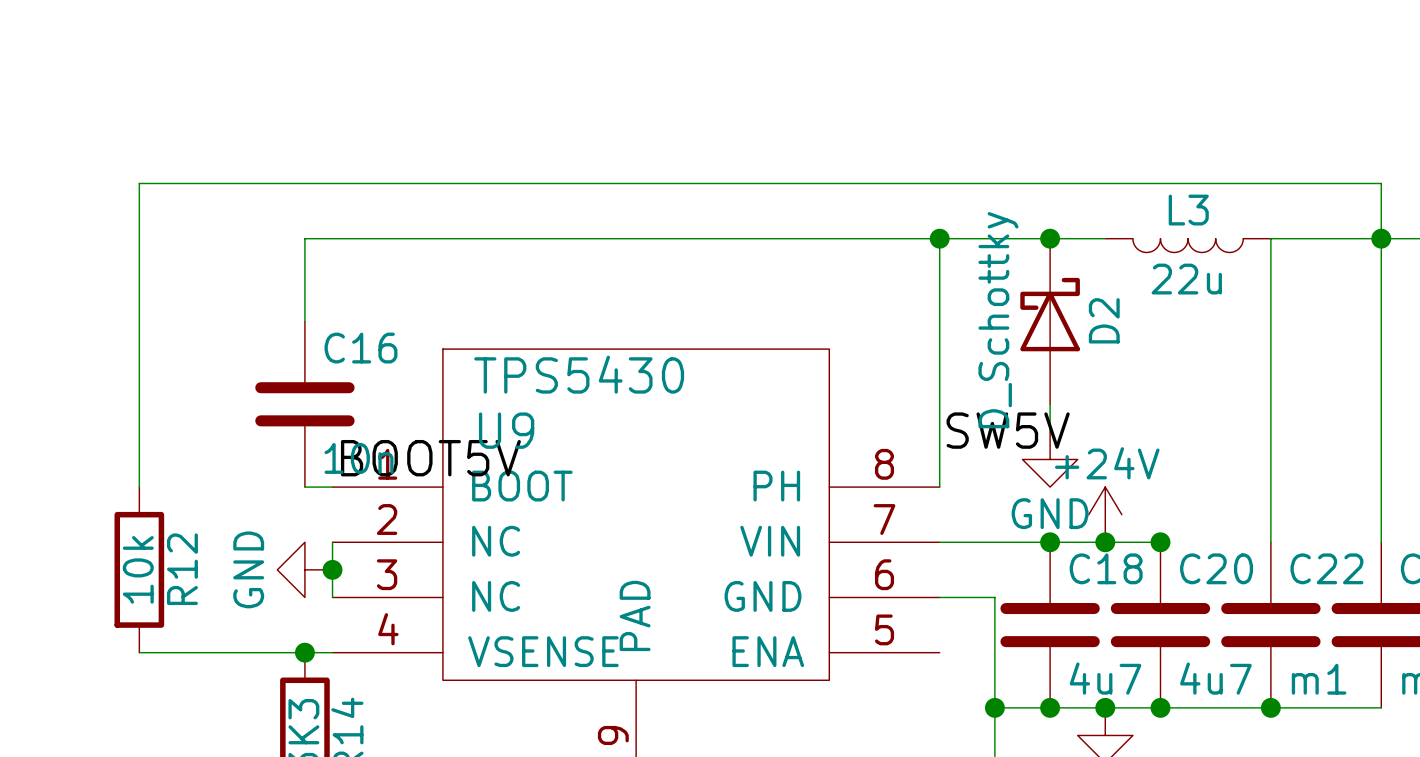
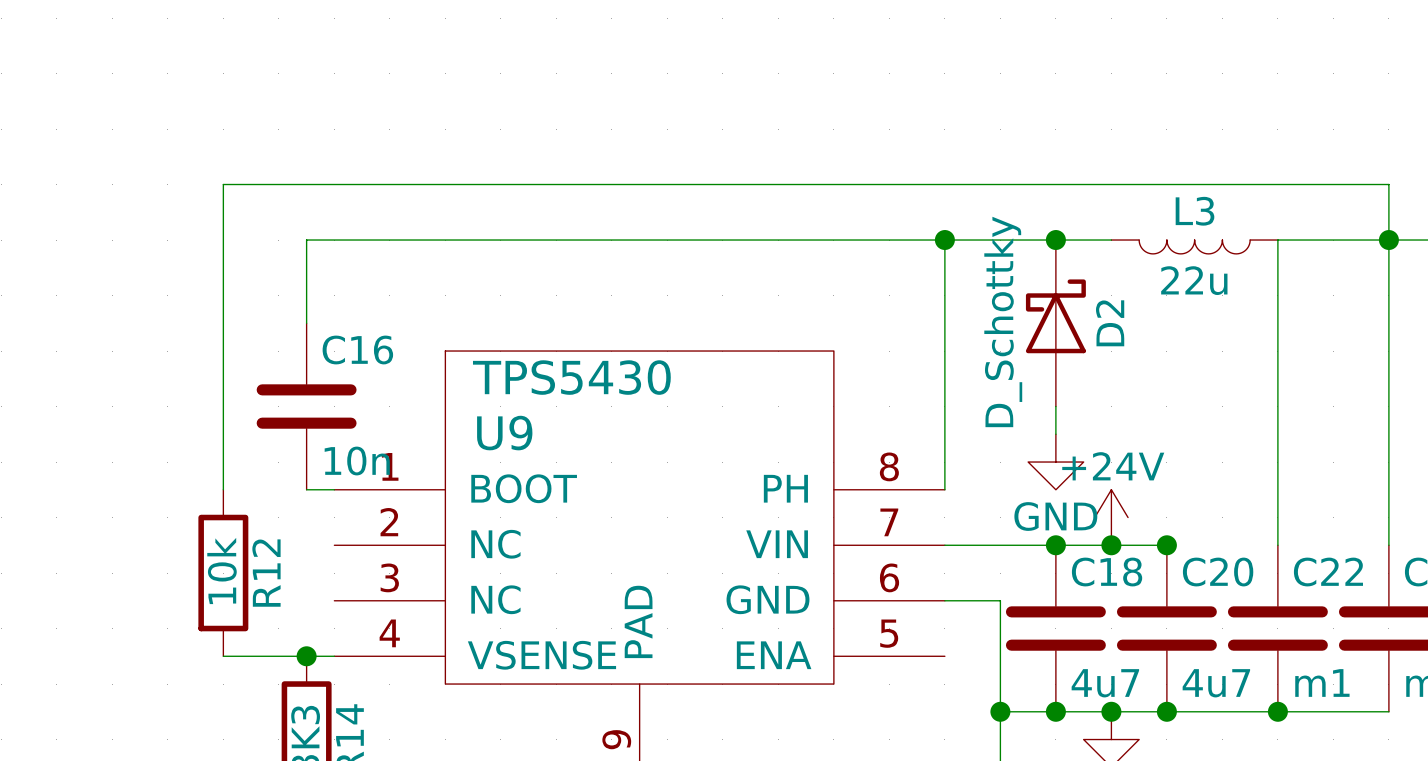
wire: (222, 183) (139, 183) (139, 487) -> (223, 184) (223, 489)
label: SW5V (1008, 430) -> none
label: BOOT5V (430, 458) -> none
wire: (332, 542) (332, 597) -> none
R12 position: (139, 569) -> (223, 573)
power symbol: GND (304, 569) -> none
junction: (332, 569) -> none
wire: (139, 652) (222, 652) -> none

